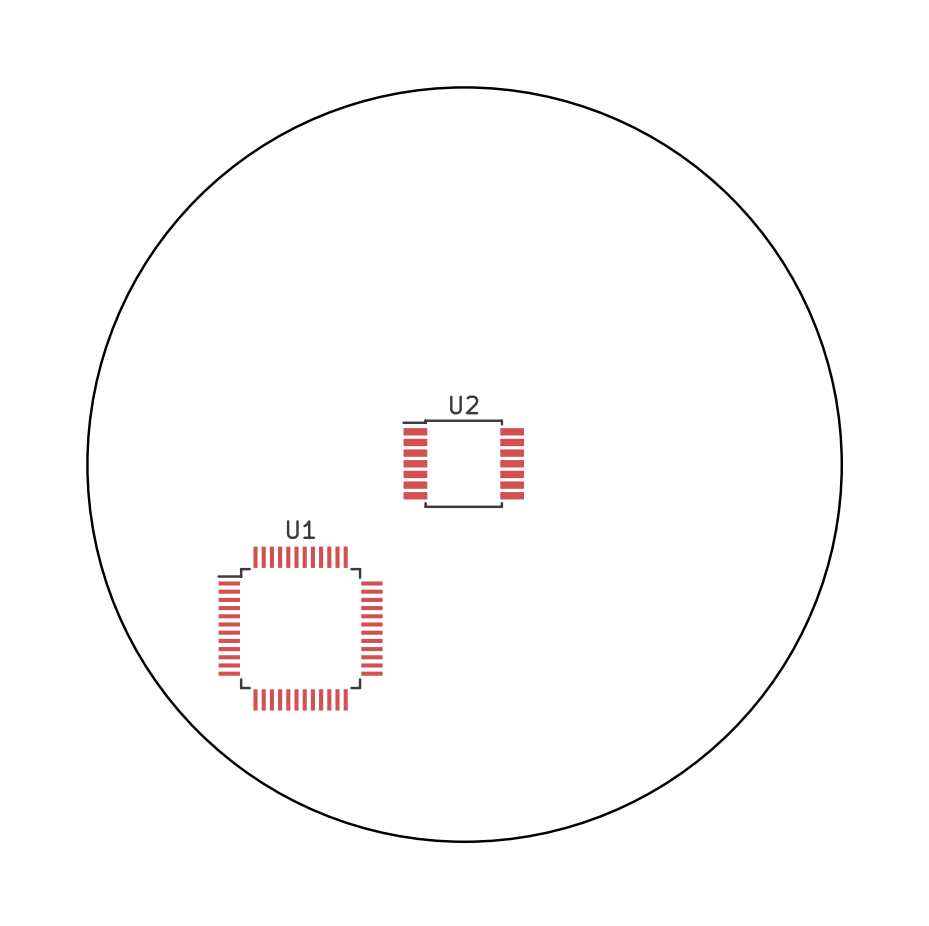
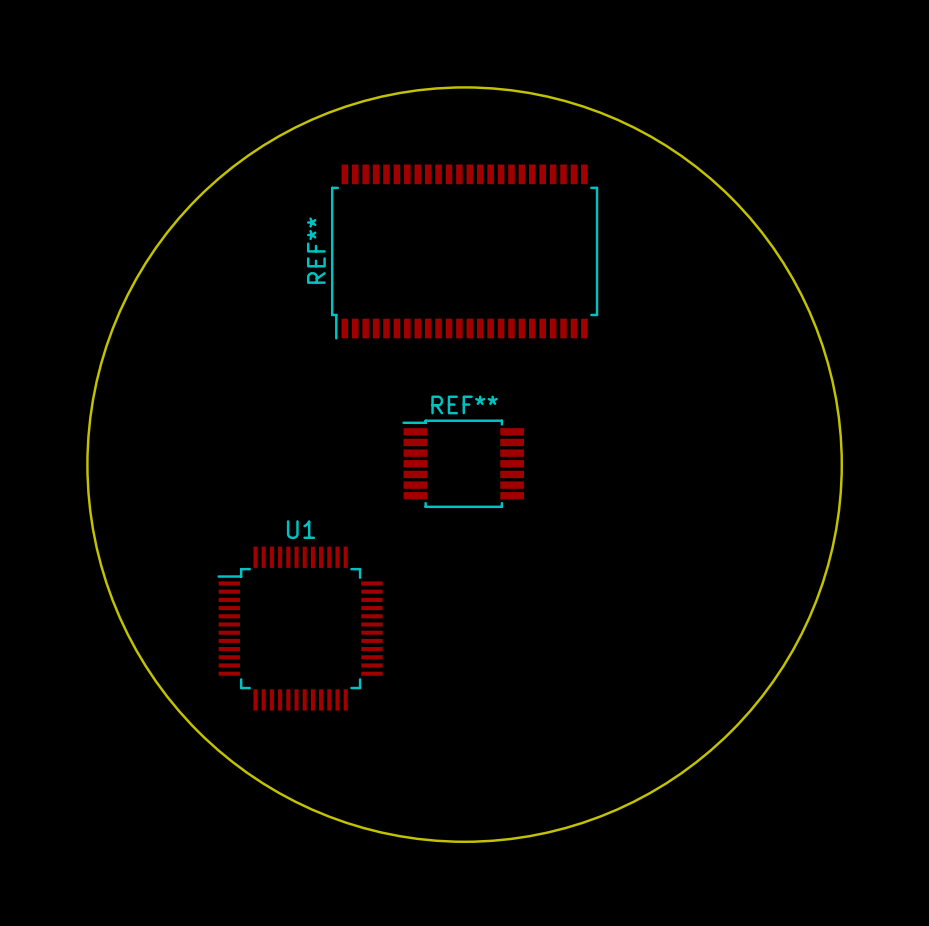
REF**: none -> (464, 252)
U2 name: U2 (464, 404) -> REF** (464, 404)

